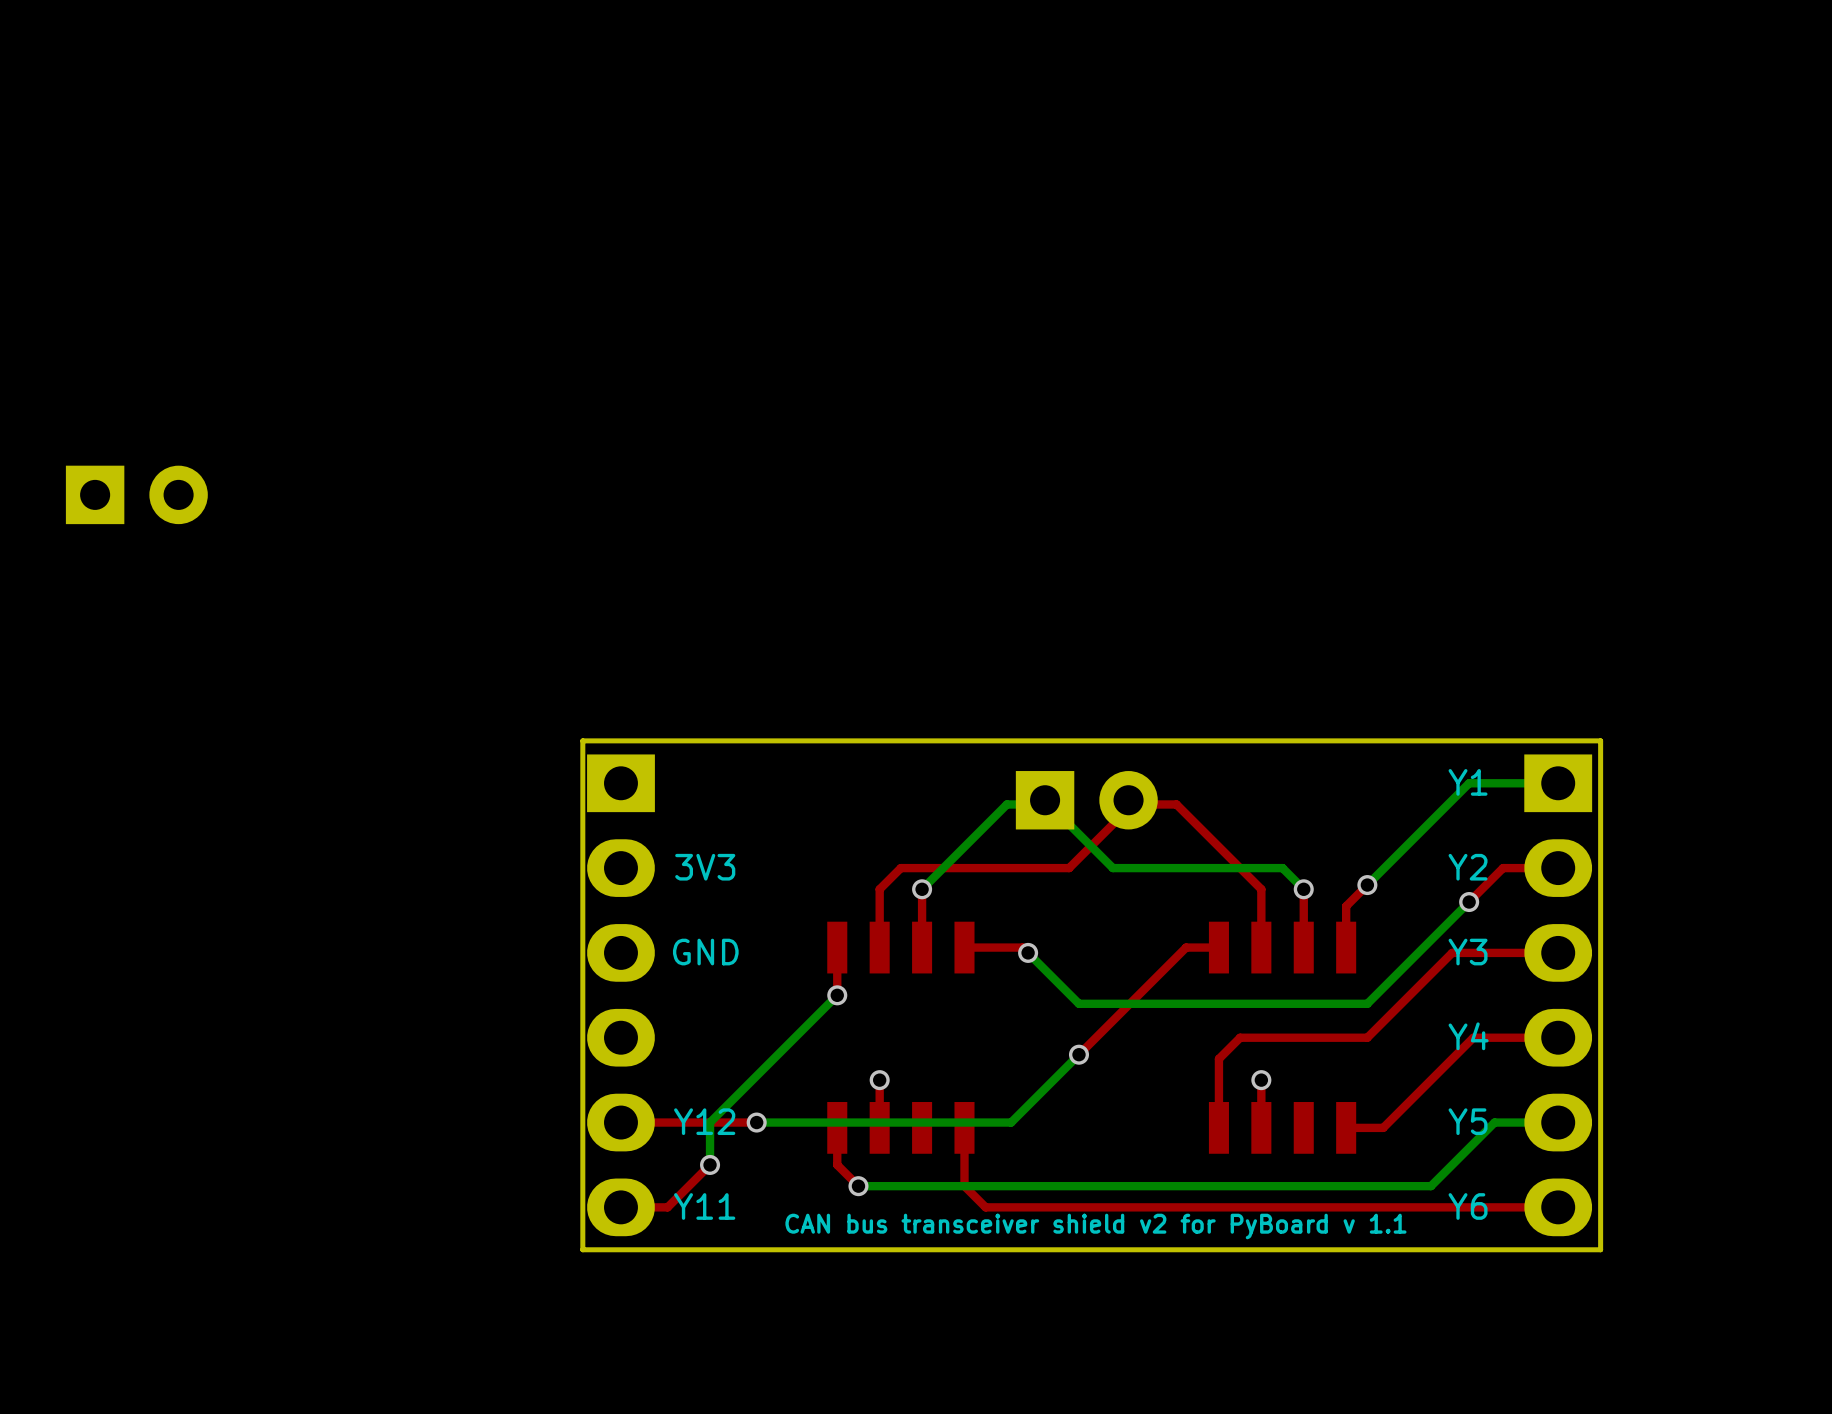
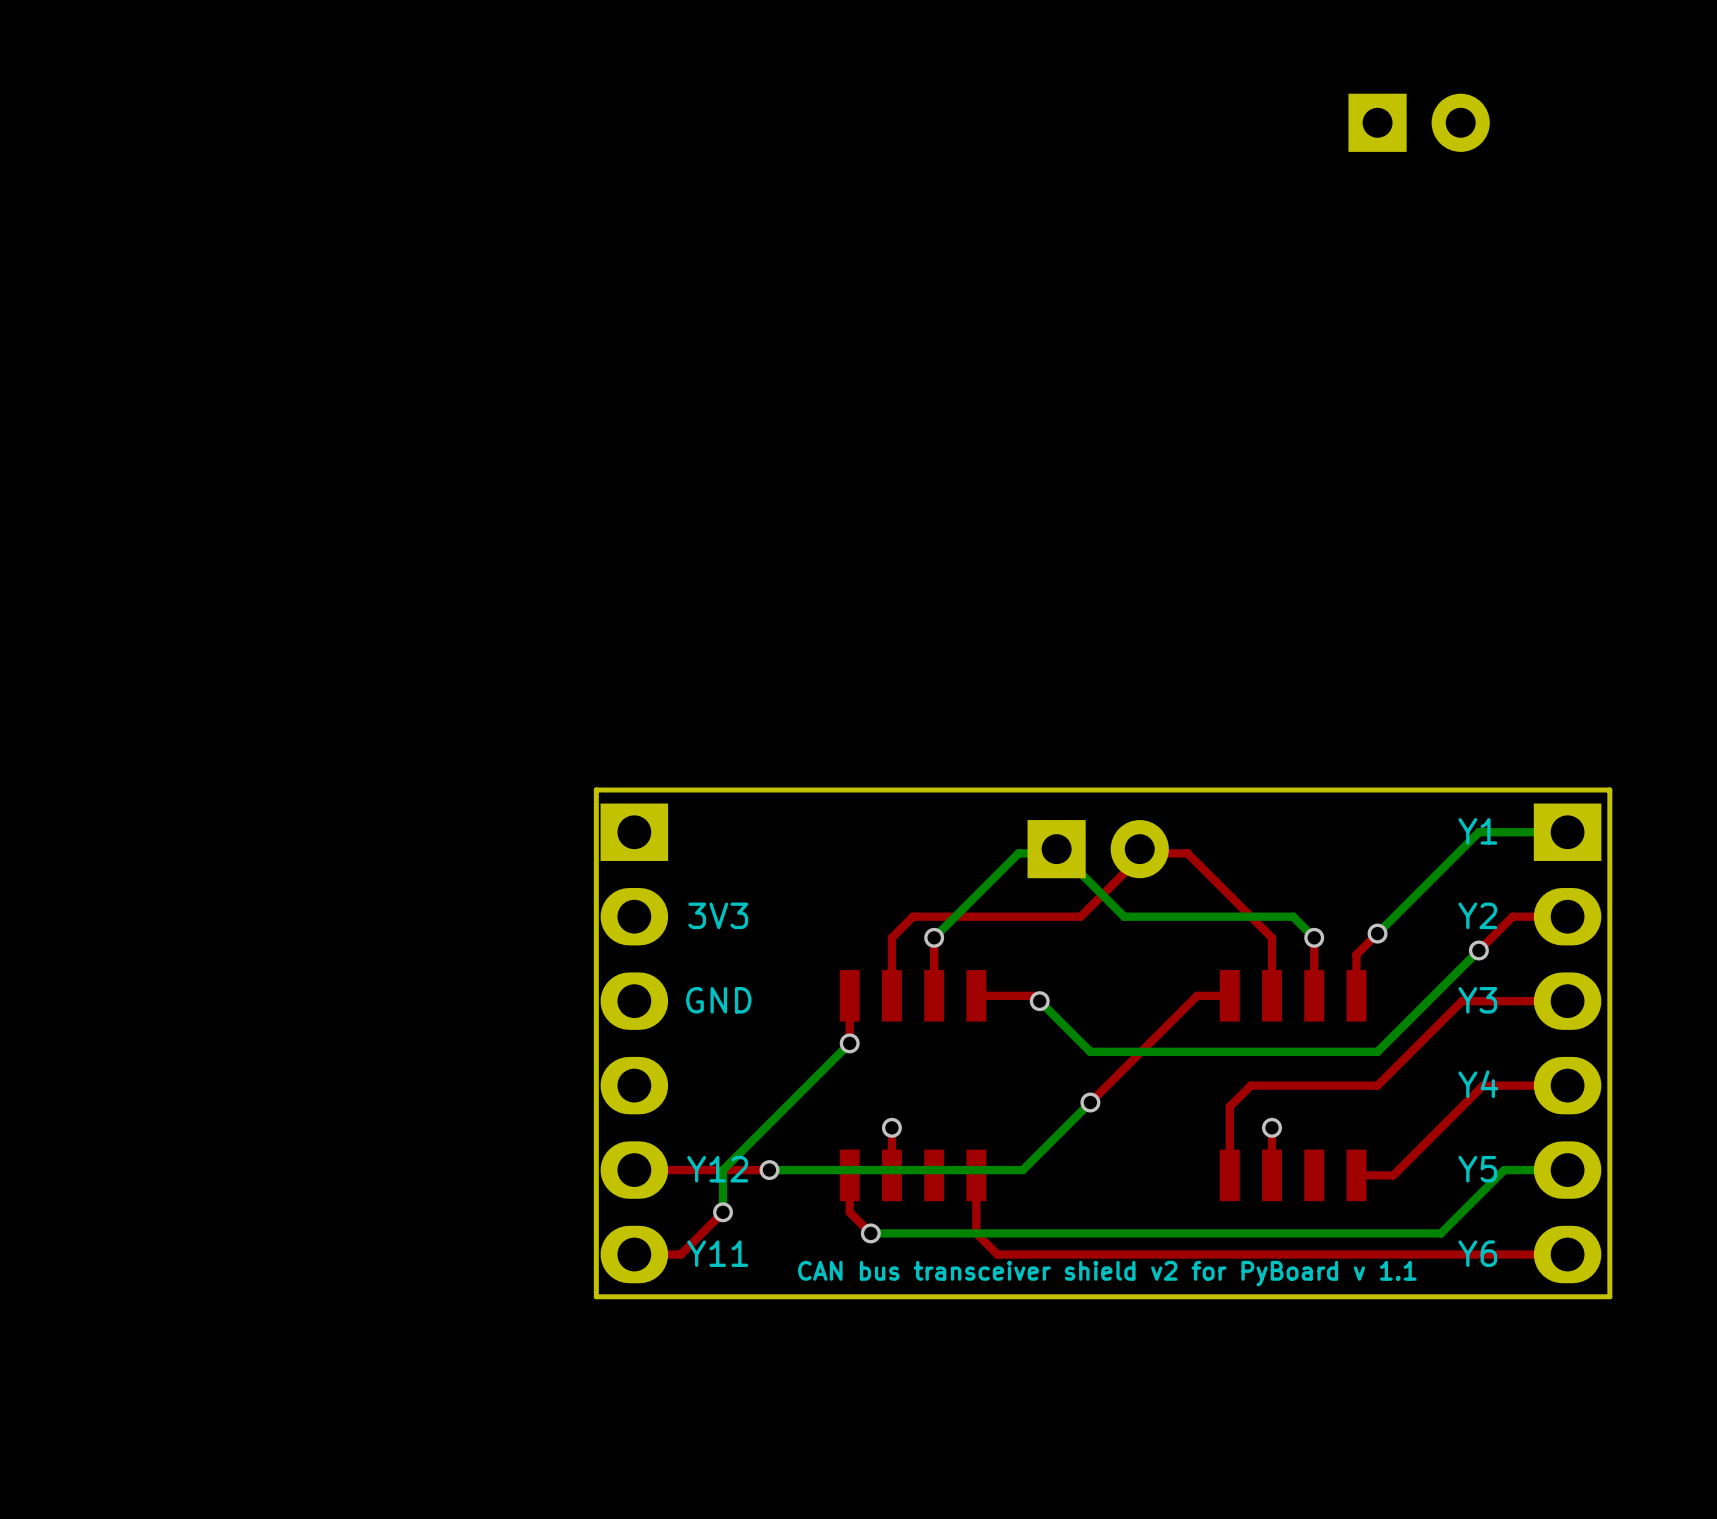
part: none -> (1419, 122)
part: (136, 494) -> none

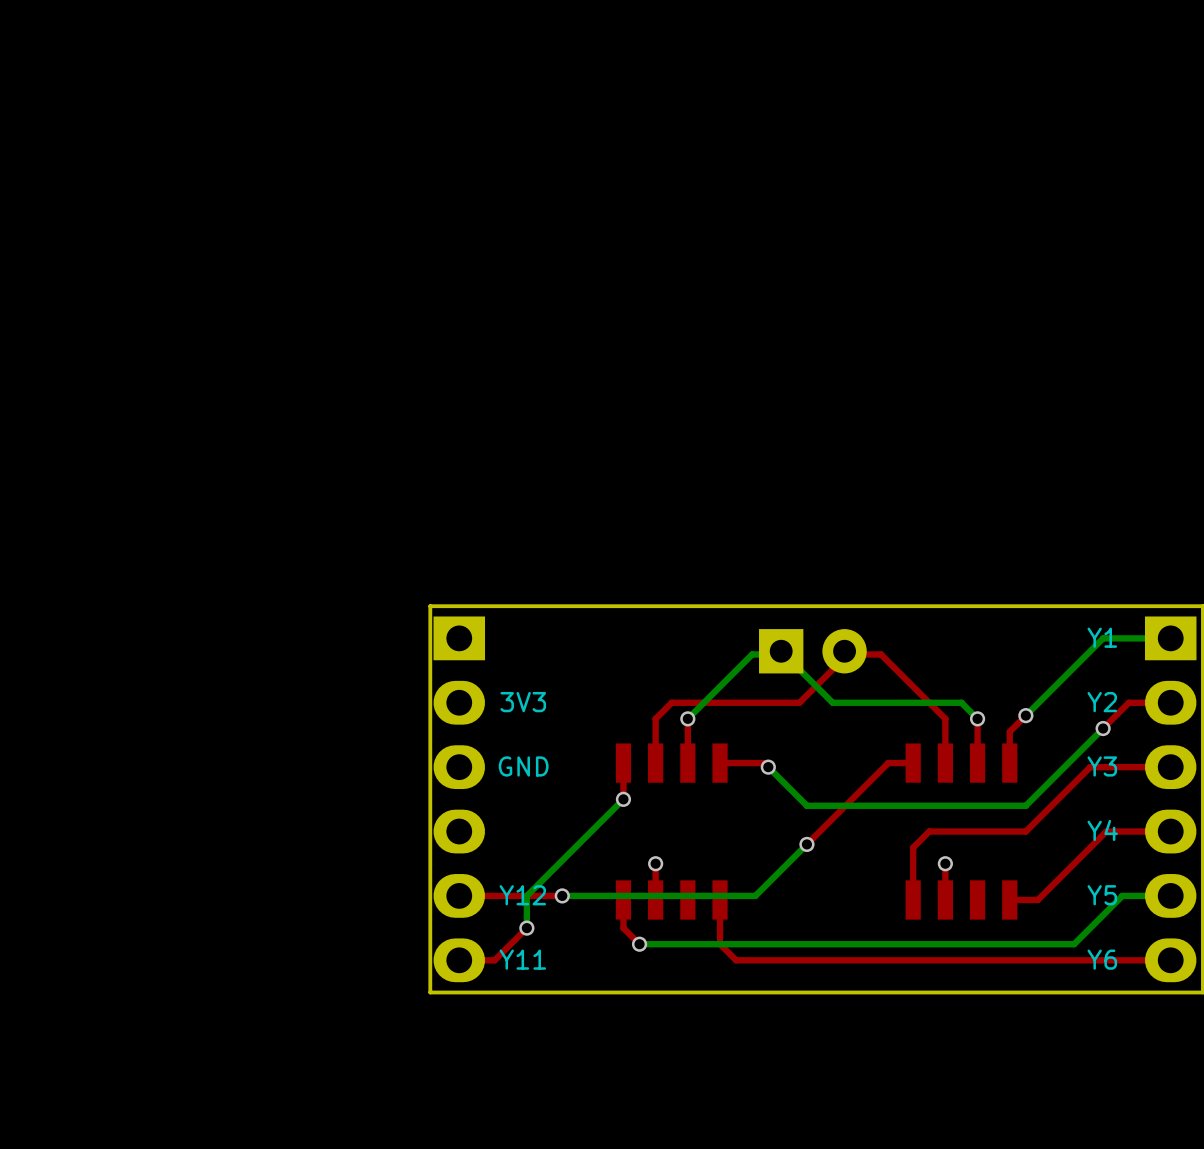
part: (1419, 122) -> none
text: CAN bus transceiver shield v2 for PyBoard v 1.1 (1107, 1273) -> none

